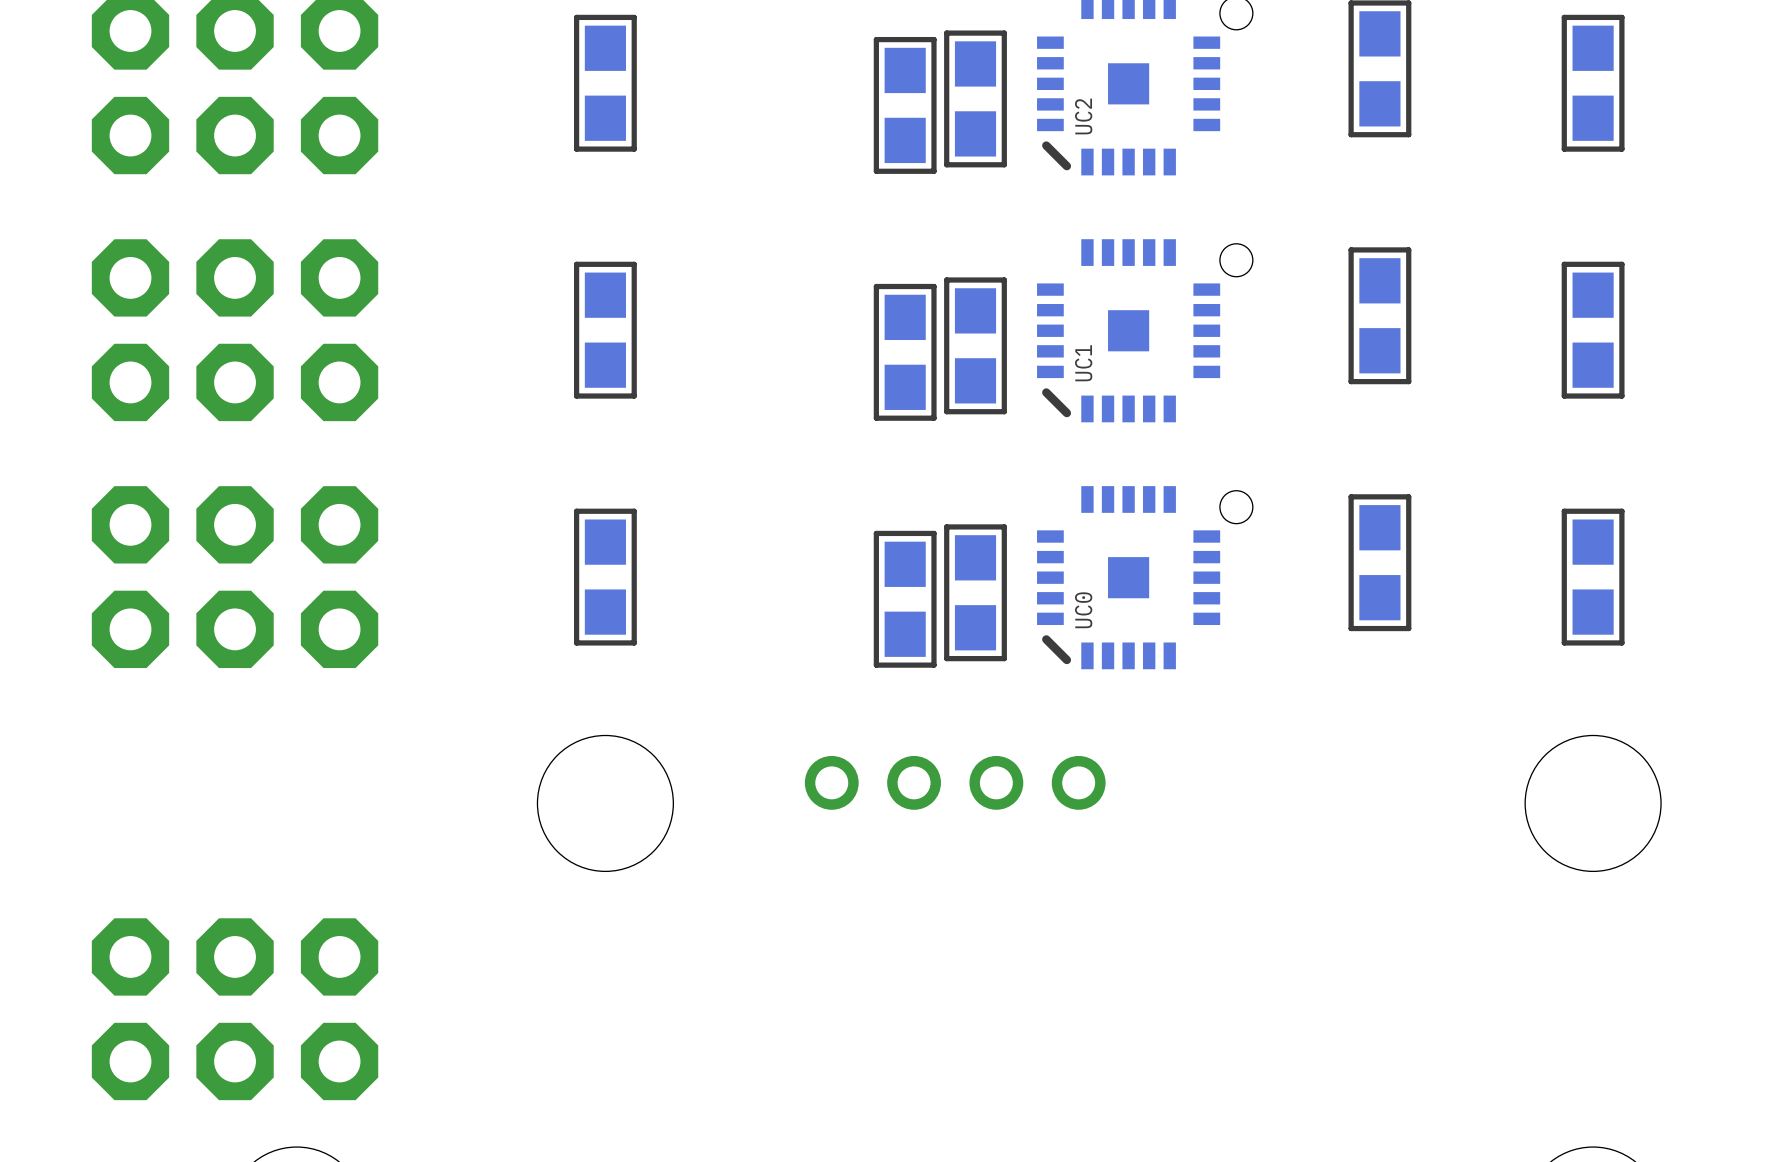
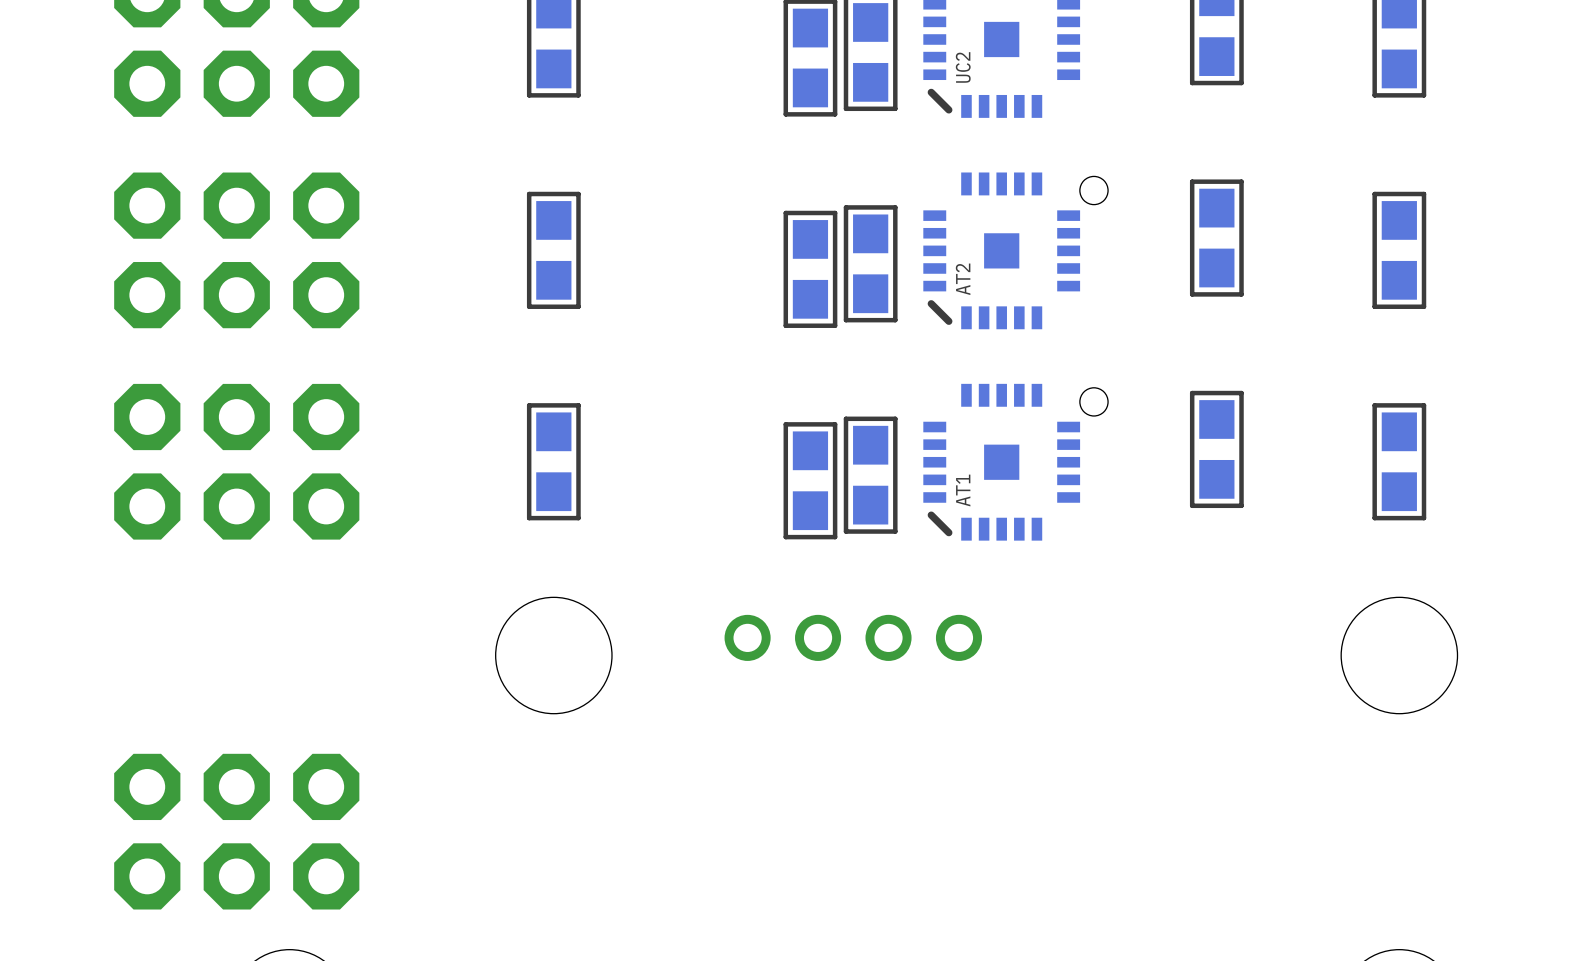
UC1 name: UC1 (1083, 363) -> AT2 (963, 279)
UC0 name: UC0 (1083, 610) -> AT1 (963, 490)

